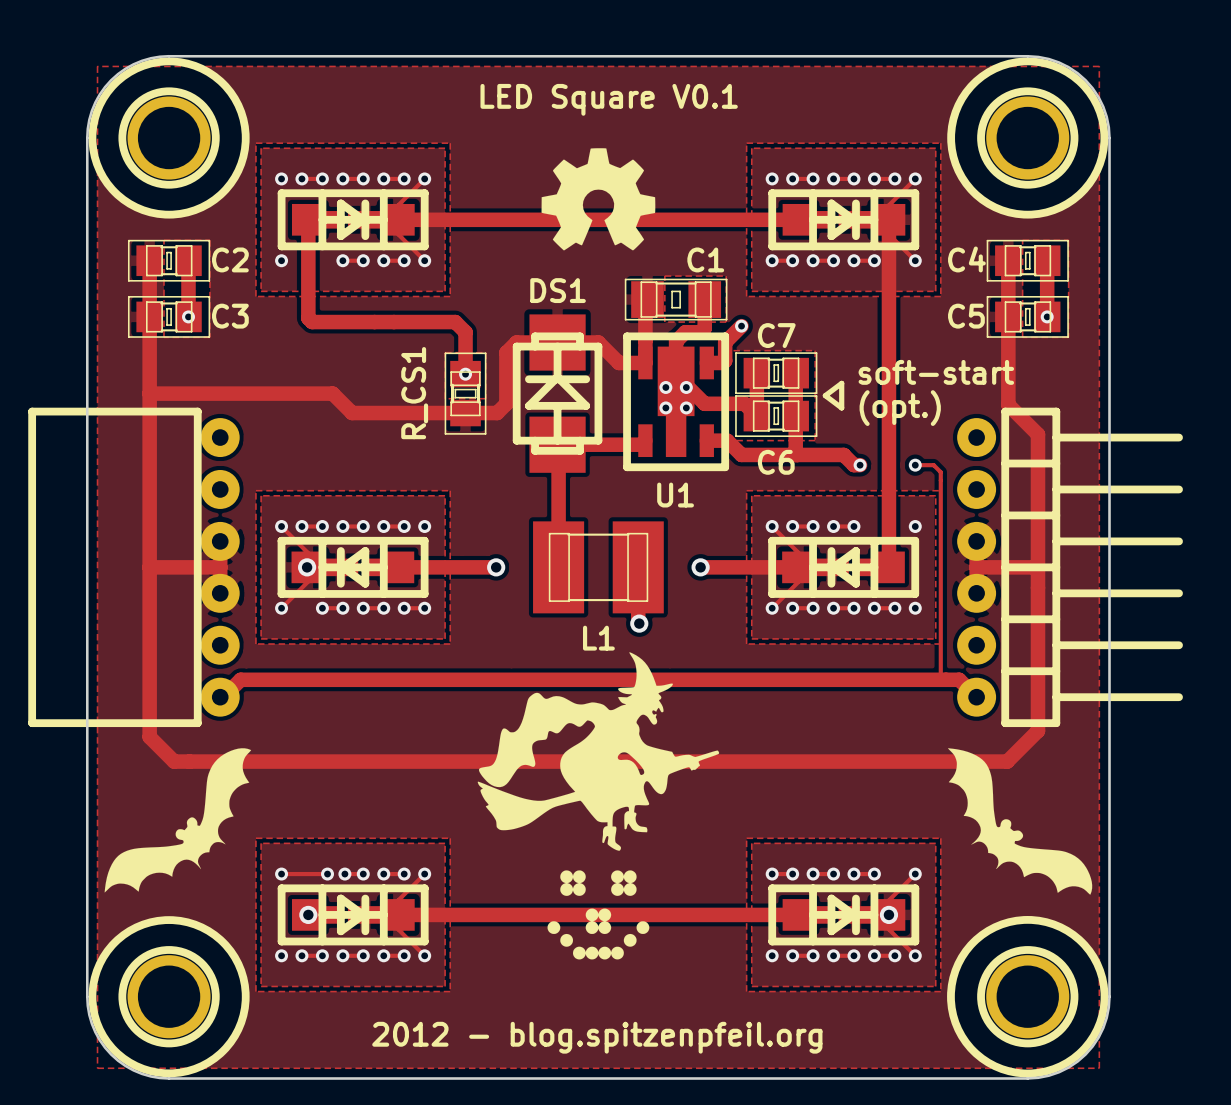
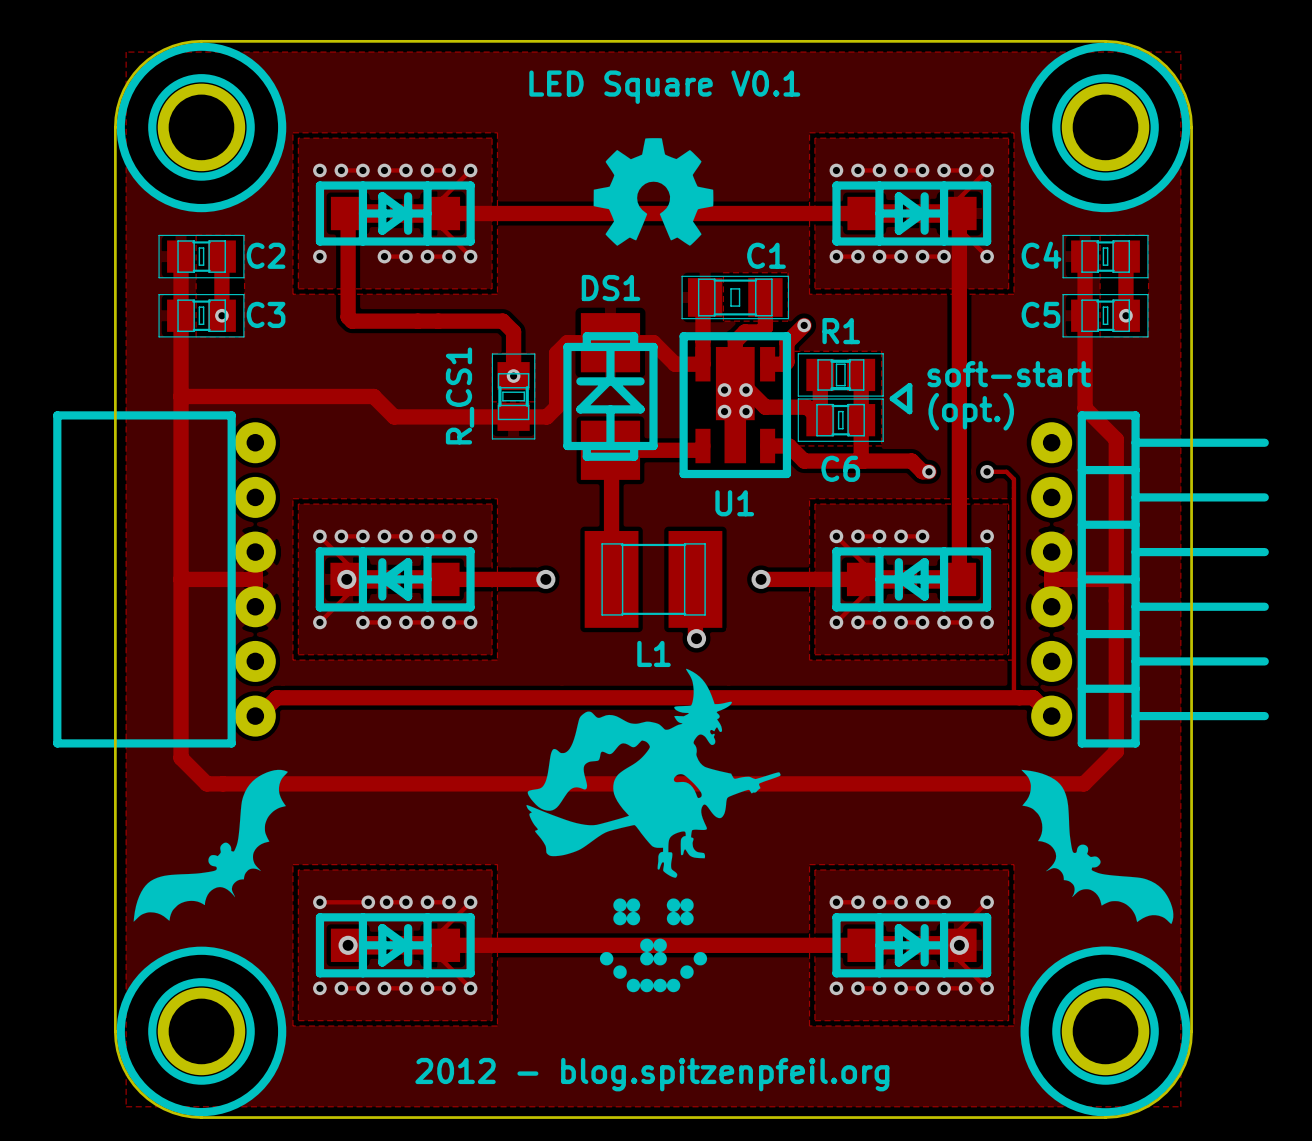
C7: (776, 373) -> none
R1: none -> (840, 374)

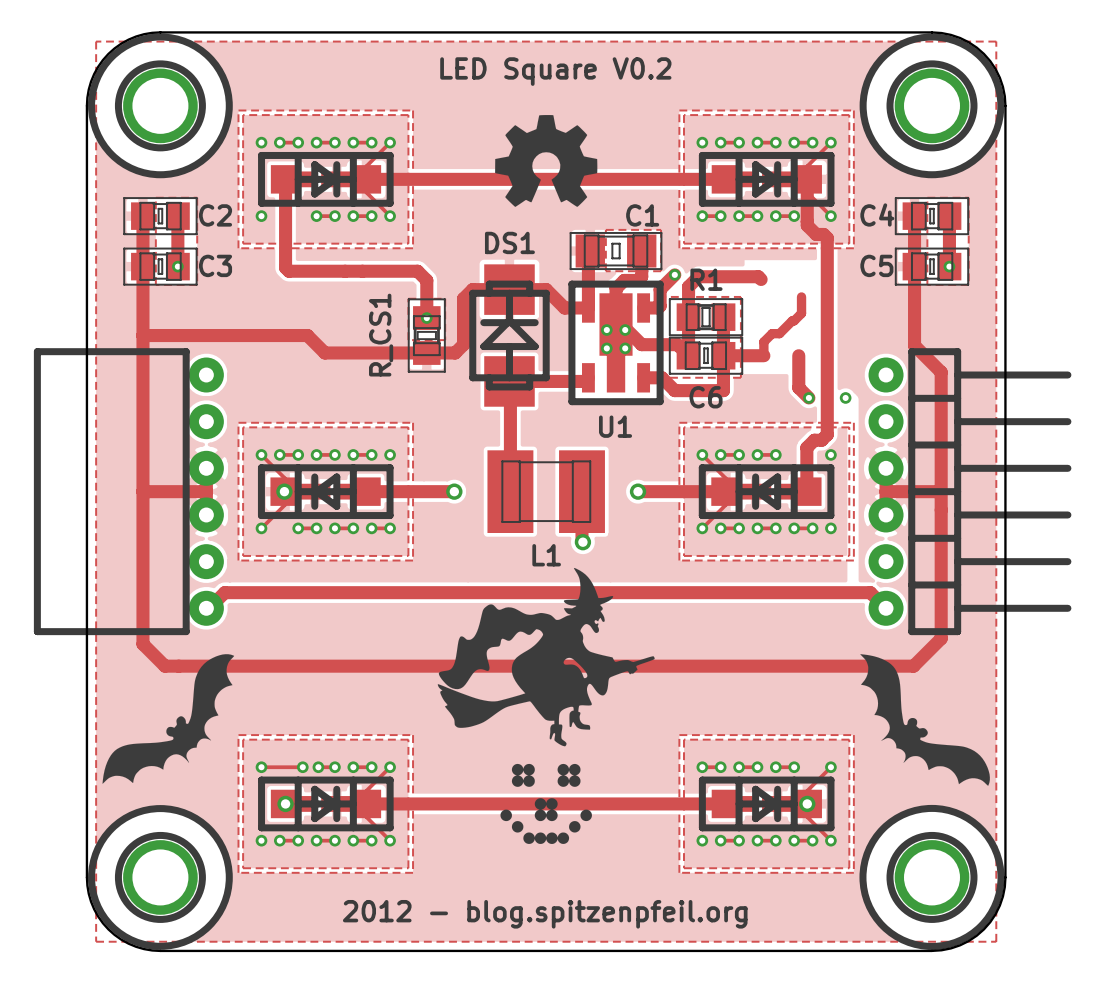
text: LED Square V0.1 (664, 87) -> LED Square V0.2 (555, 71)
track: (959, 267) (959, 578) -> (807, 225) (816, 234) (823, 234) (827, 238) (827, 434) (821, 440) (814, 440) (806, 447) (806, 491)
track: none -> (761, 279) (758, 276) (698, 276) (688, 286) (688, 317)
track: none -> (801, 296) (801, 313) (779, 333) (772, 333) (763, 341) (763, 355) (723, 355)
text: soft-start (1009, 374) -> none
line: (909, 385) (909, 411) (892, 398) (909, 385) -> none
text: (opt.) (971, 411) -> none
track: none -> (798, 355) (798, 387) (808, 397)
track: (861, 461) (911, 461) (922, 471) (928, 471) -> none
via: none -> (808, 397)
via: none -> (845, 397)
via: (928, 471) -> none
track: (987, 471) (1006, 471) (1013, 479) (1013, 697) (1019, 697) -> none
via: (987, 471) -> none

